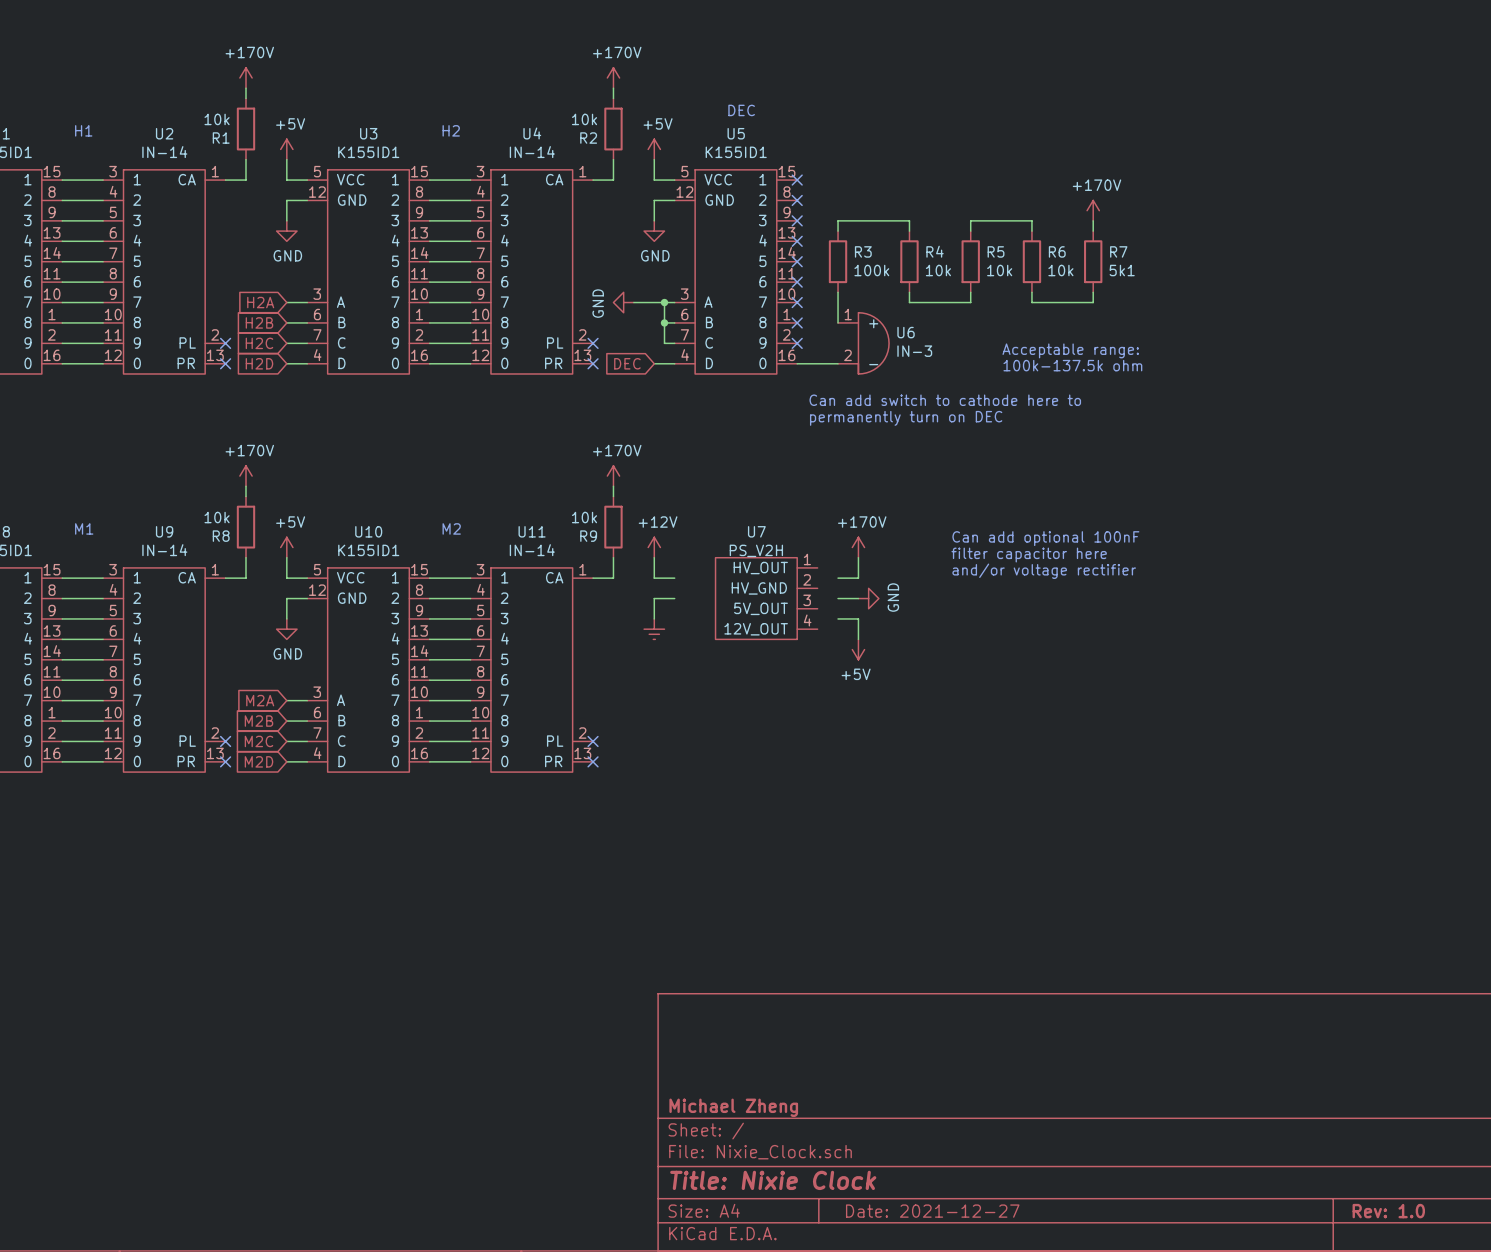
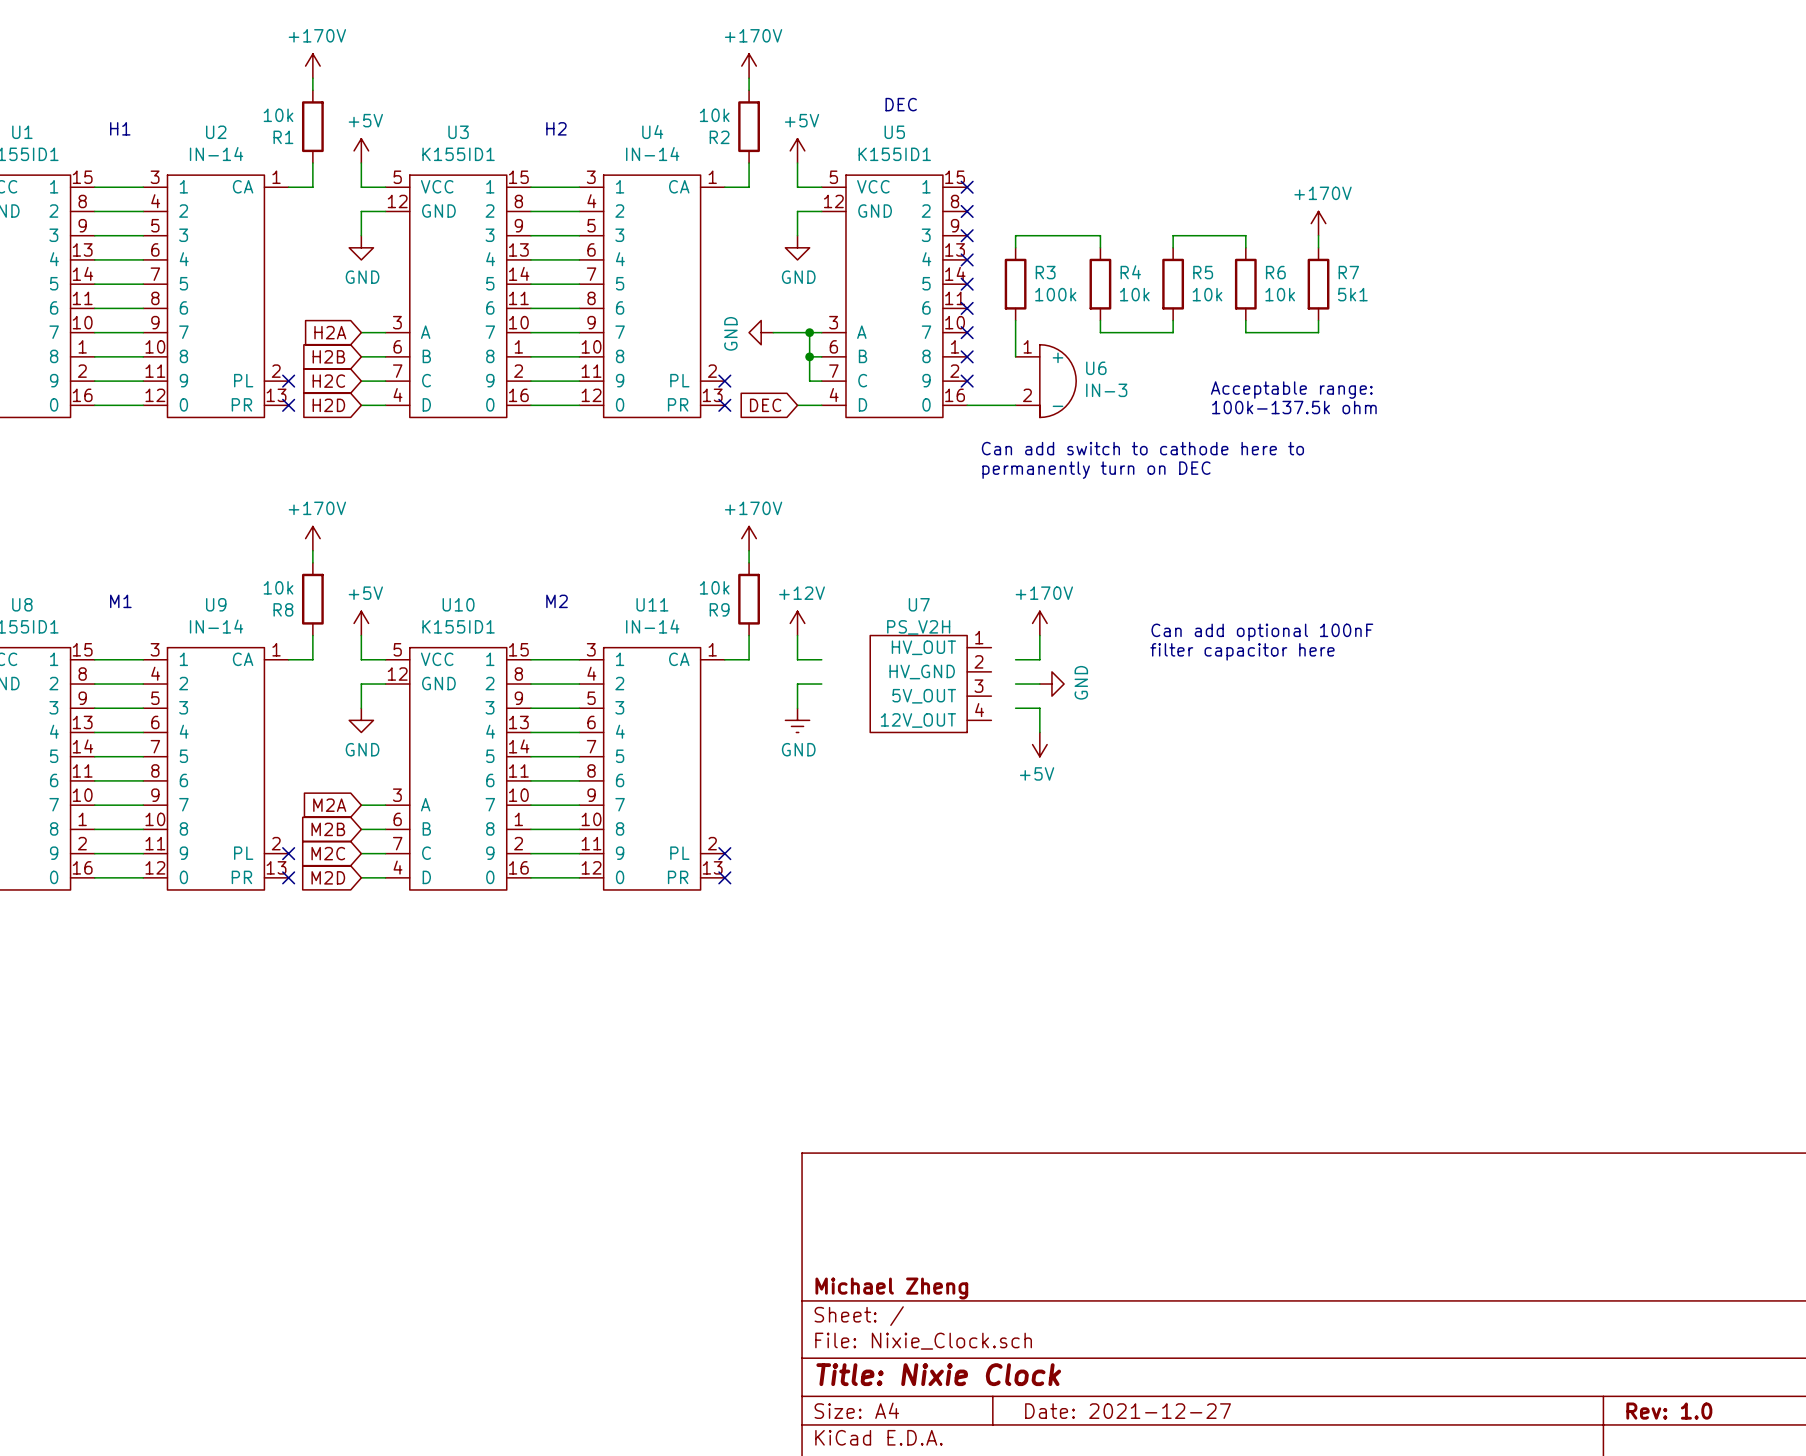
text: Can add optional 100nF (1045, 538) -> none
text: filter capacitor here (1029, 555) -> Can add optional 100nF (1262, 632)
text: and/or voltage rectifier (1044, 571) -> filter capacitor here (1242, 651)
power symbol text: none -> GND (798, 749)

